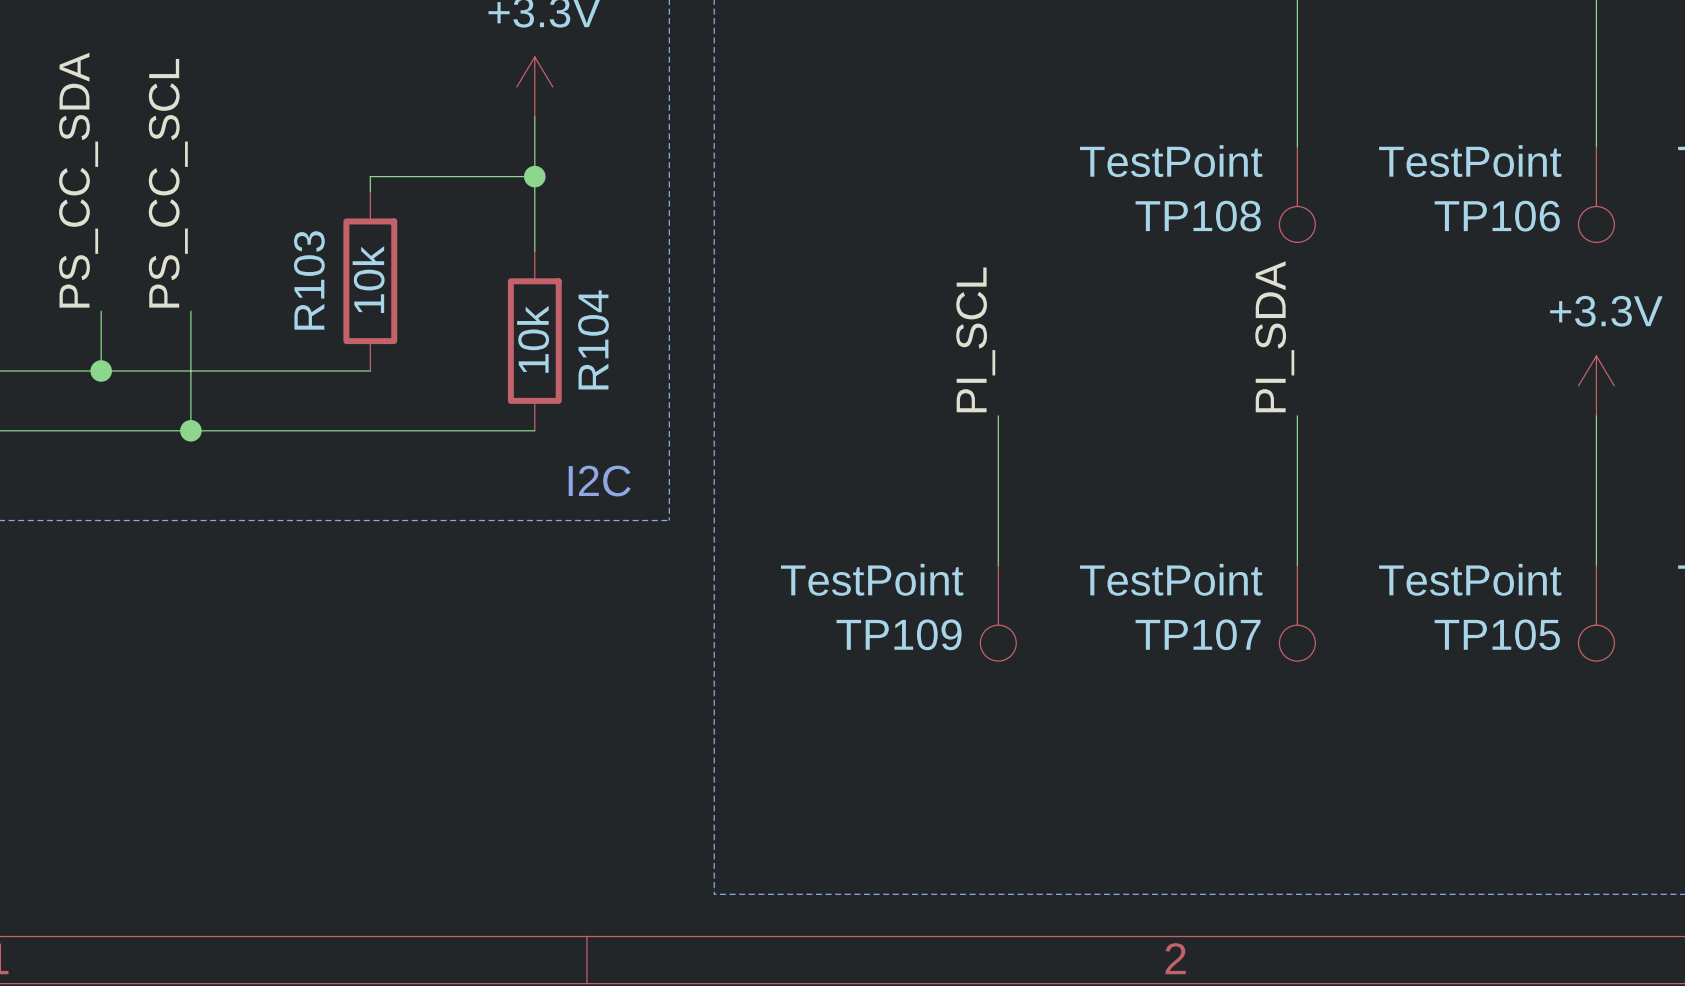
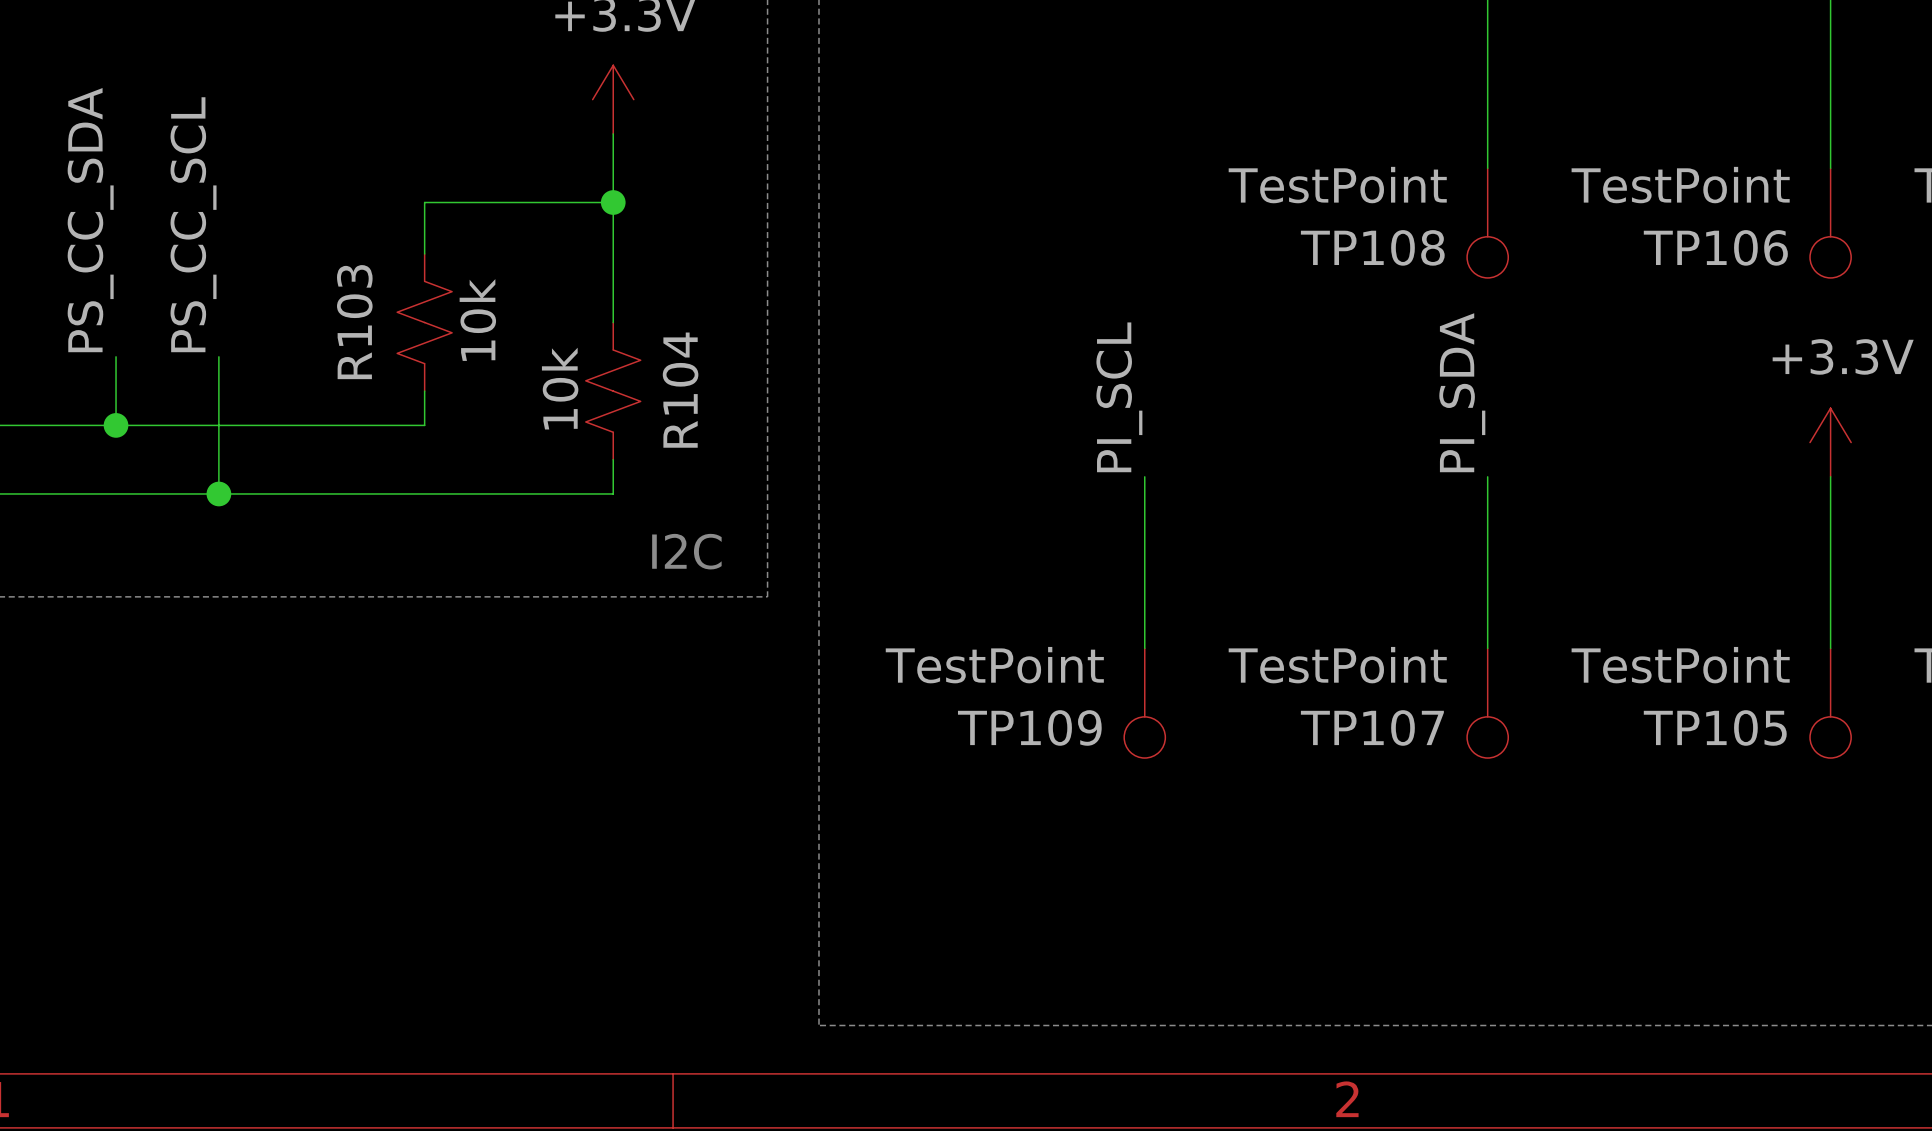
R103 symbol: [343, 191, 398, 371] -> [397, 253, 453, 392]
R104 symbol: [507, 251, 562, 431] -> [585, 322, 641, 460]
R103 value position: 10k (368, 279) -> 10k (477, 320)

